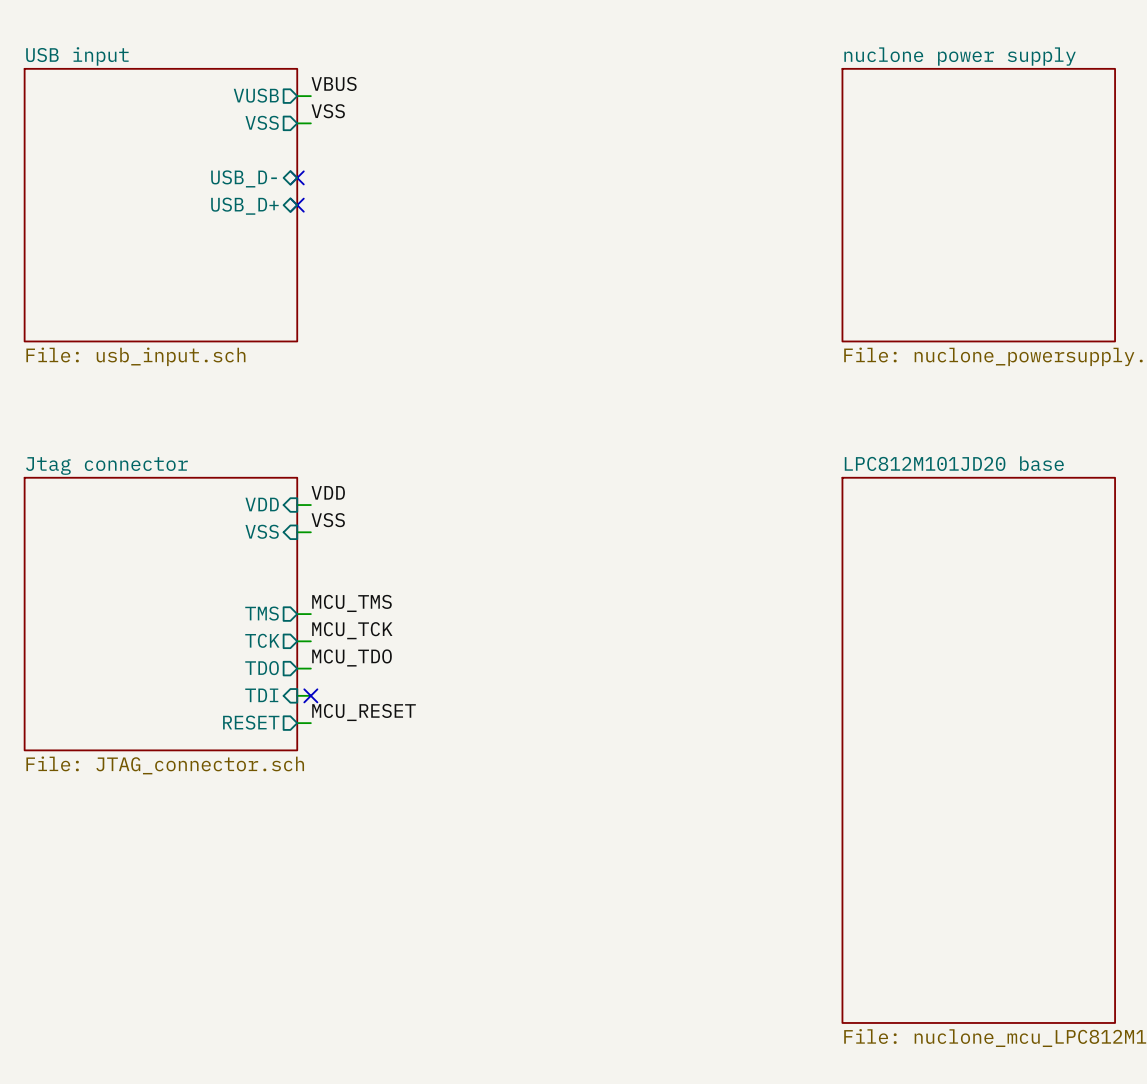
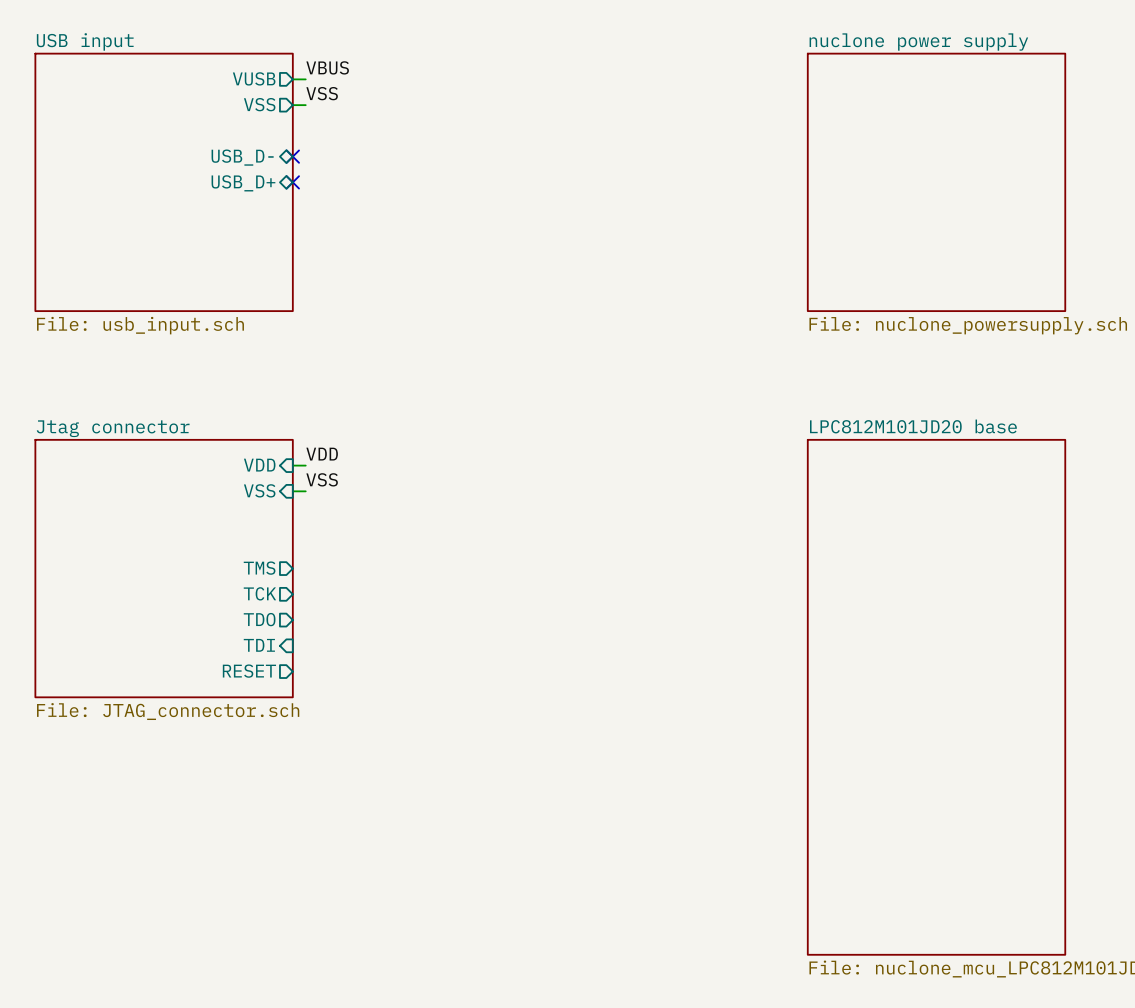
label: MCU_TMS (351, 603) -> none
wire: (297, 614) (310, 614) -> none
label: MCU_TCK (352, 630) -> none
wire: (297, 641) (310, 641) -> none
label: MCU_TDO (351, 657) -> none
wire: (297, 668) (310, 668) -> none
wire: (297, 695) (310, 695) -> none
no-connect mark: (310, 695) -> none
label: MCU_RESET (364, 712) -> none
wire: (297, 723) (310, 723) -> none

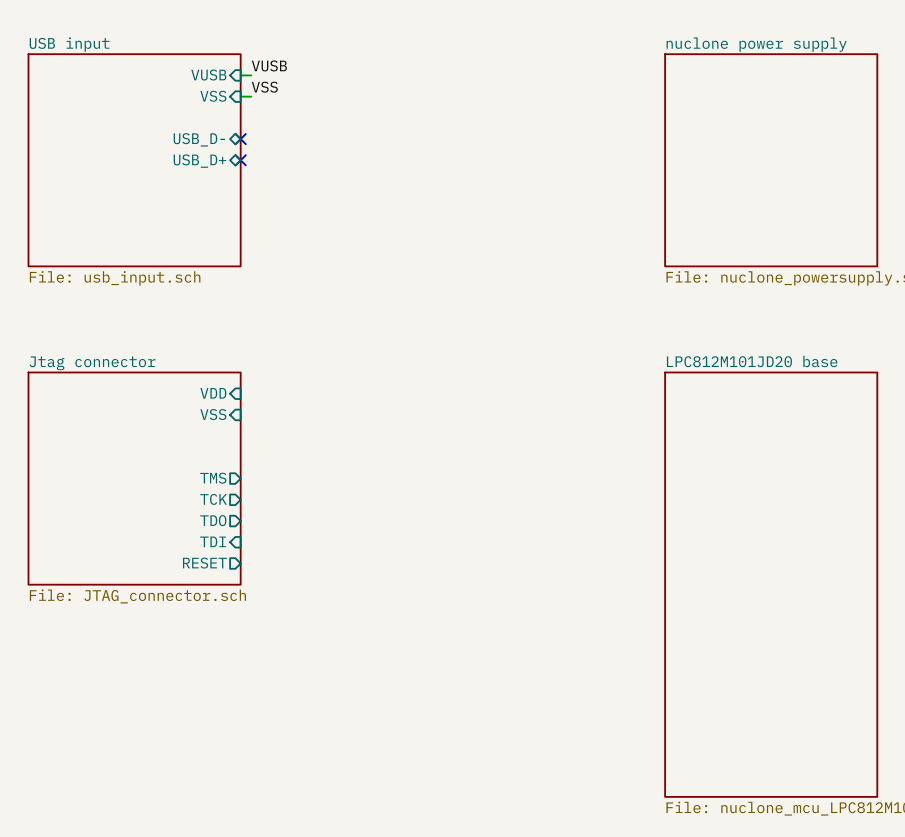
label: VBUS (327, 67) -> VUSB (269, 65)
sheet pin shape: output (254, 78) -> input (208, 75)
sheet pin shape: output (259, 104) -> input (213, 96)
label: VDD (322, 454) -> none
wire: (292, 465) (305, 465) -> none
label: VSS (322, 479) -> none
wire: (292, 491) (305, 491) -> none

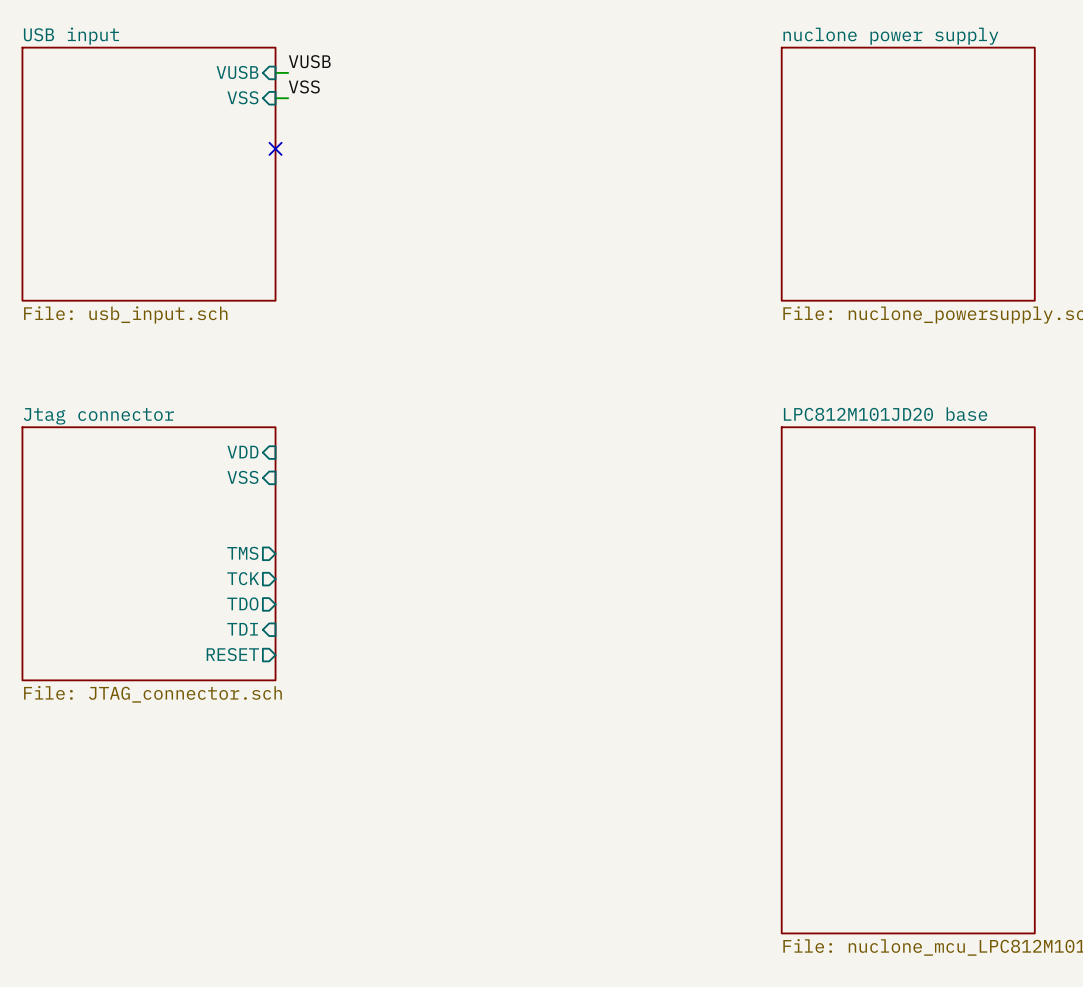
sheet pin: USB_D- (199, 139) -> none
no-connect mark: (240, 160) -> none
sheet pin: USB_D+ (199, 161) -> none

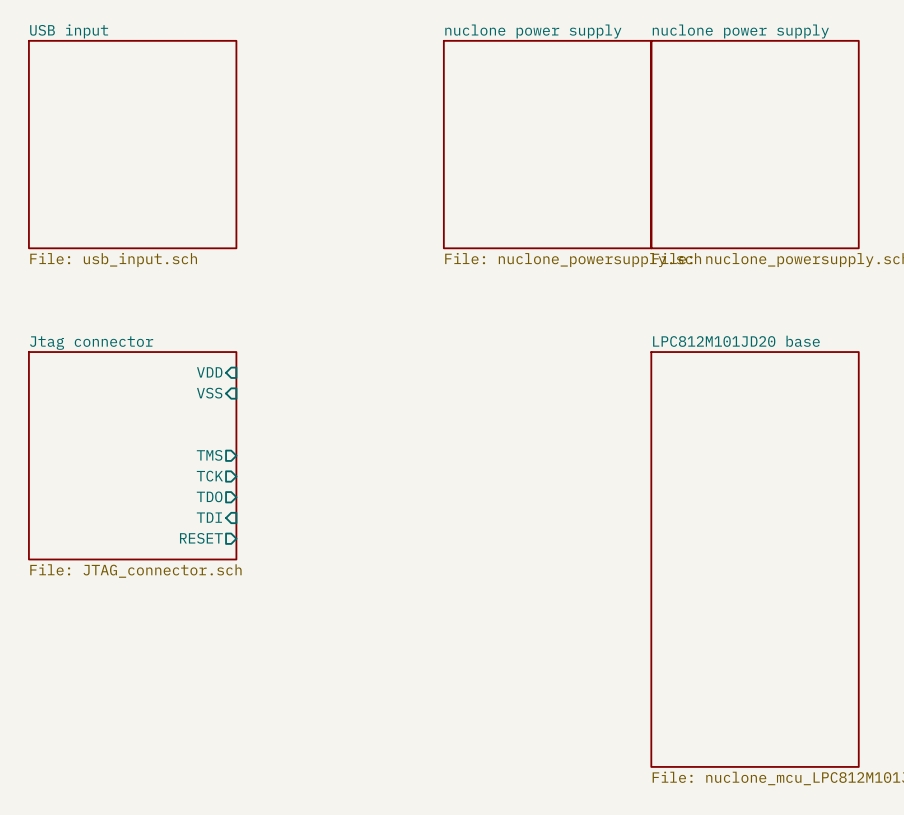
label: VUSB (309, 61) -> none
sheet pin: VUSB (237, 72) -> none
wire: (275, 72) (288, 72) -> none
label: VSS (304, 86) -> none
sheet pin: VSS (242, 97) -> none
wire: (275, 98) (288, 98) -> none
no-connect mark: (275, 148) -> none
sheet nuclone power supply: none -> File: nuclone_powersupply.sch (547, 144)

